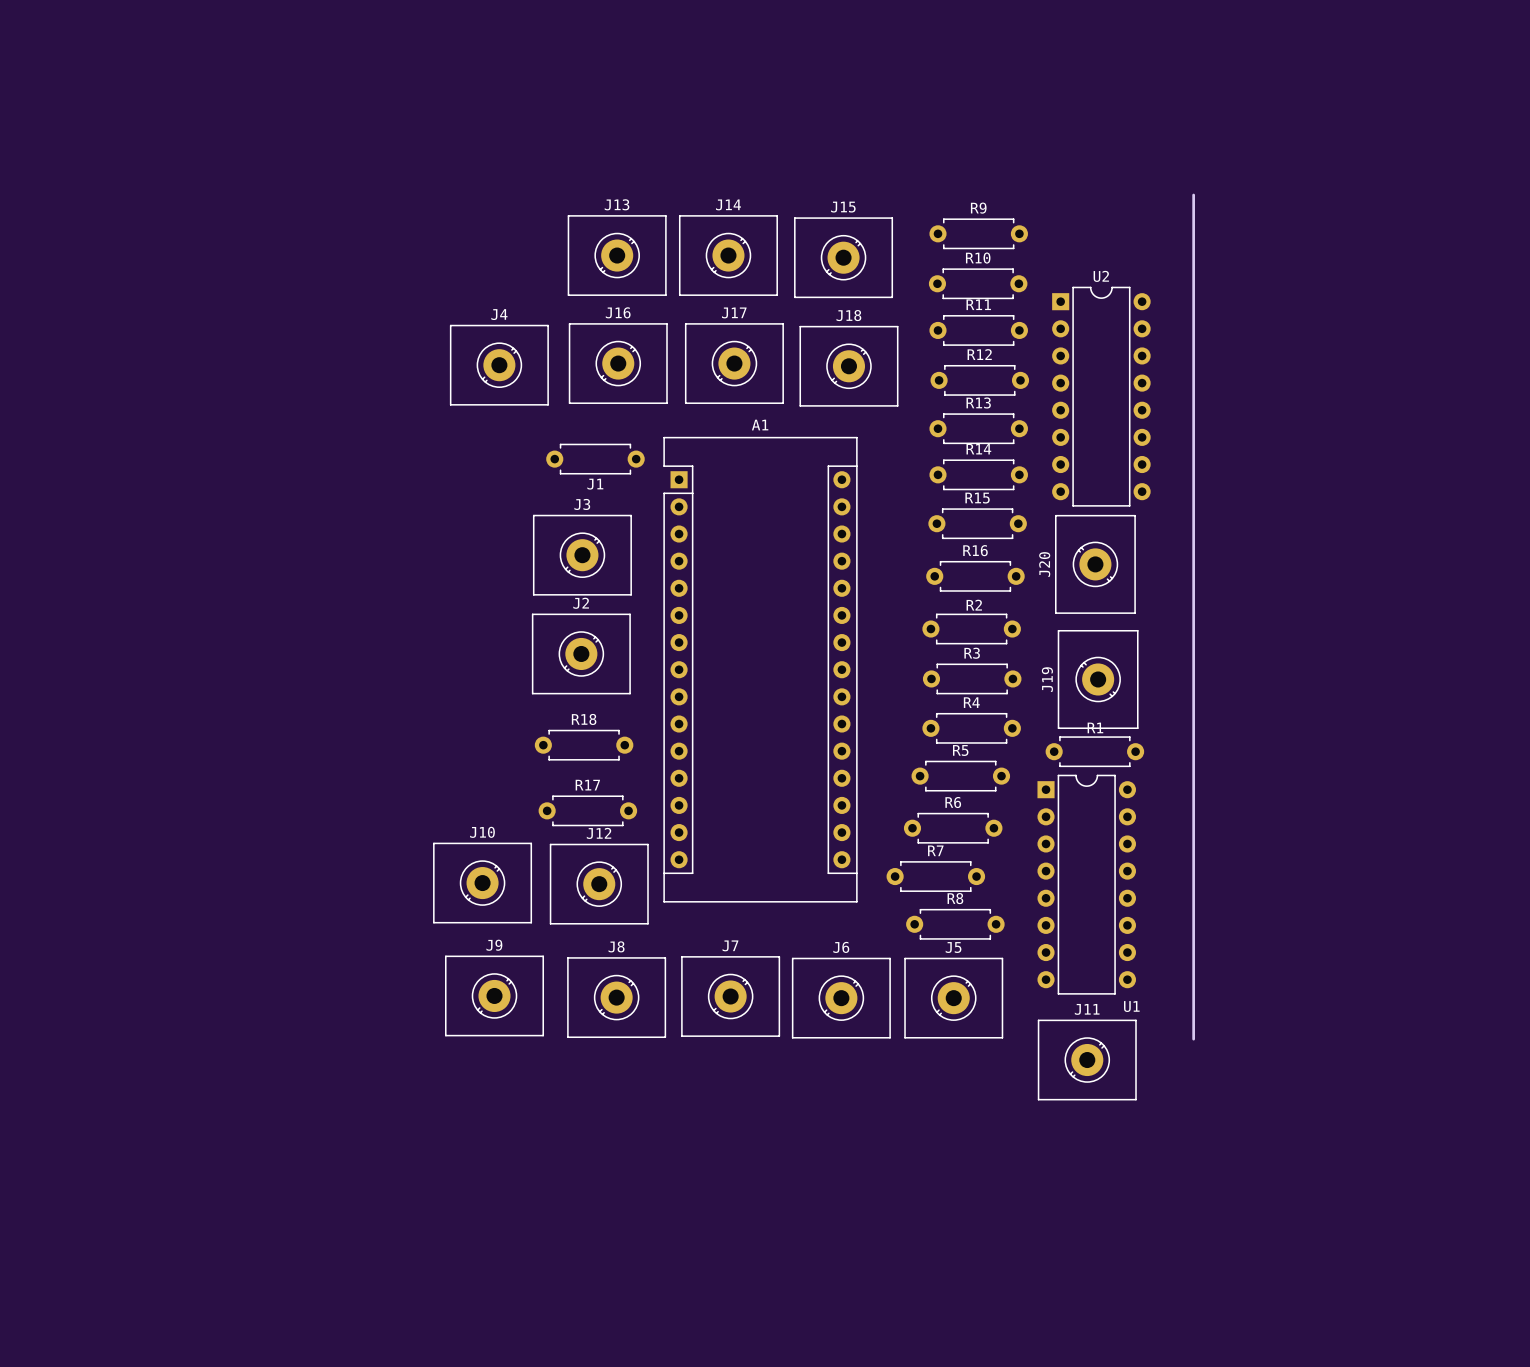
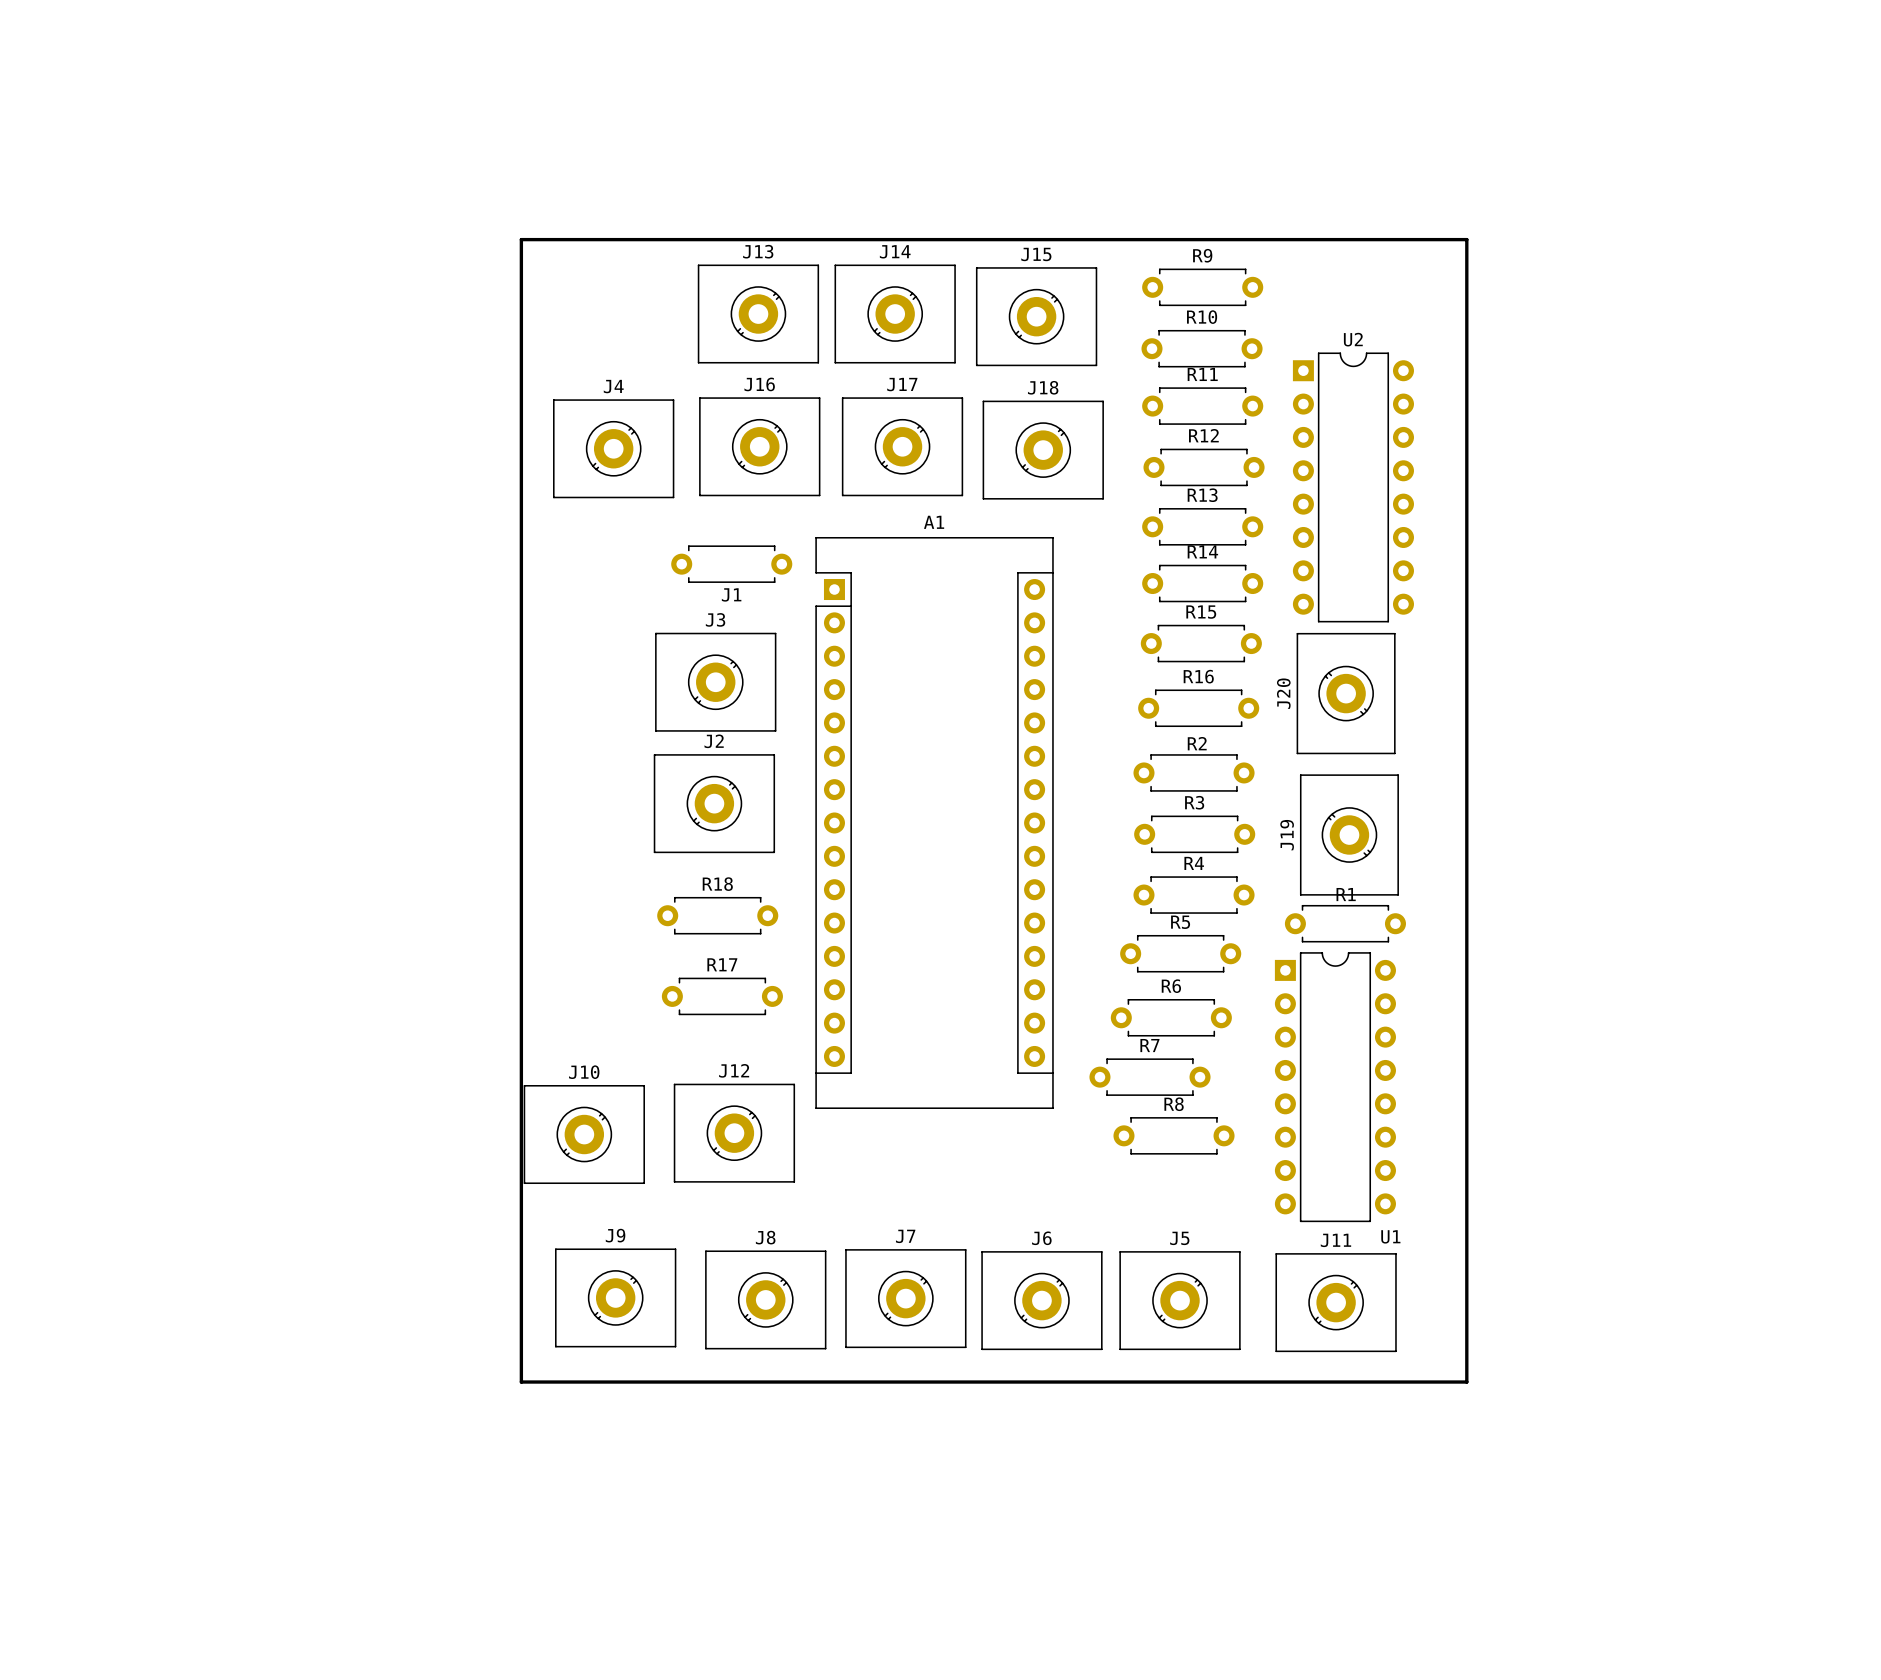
board edge: none -> (1466, 239) (521, 239) (521, 1382) (1466, 1382) (1466, 1276)
J10 position: (482, 883) -> (584, 1134)
J12 position: (599, 884) -> (734, 1133)
J9 position: (494, 995) -> (615, 1297)
J7 position: (730, 996) -> (905, 1298)
J8 position: (616, 997) -> (765, 1299)
J6 position: (841, 998) -> (1041, 1300)
J5 position: (953, 998) -> (1180, 1300)

